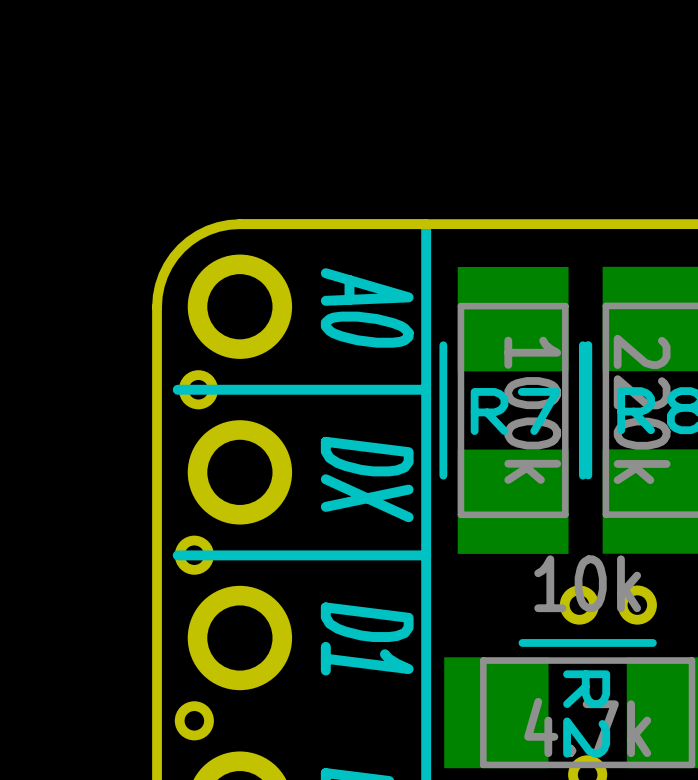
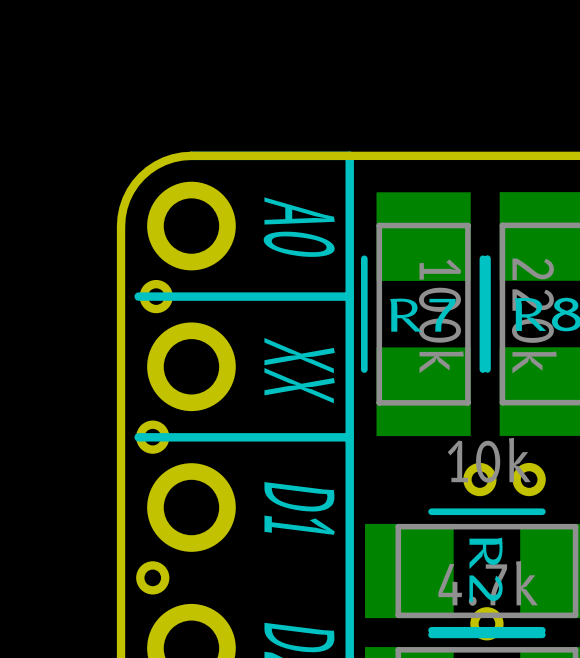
text: DX (367, 479) -> XX (299, 370)

